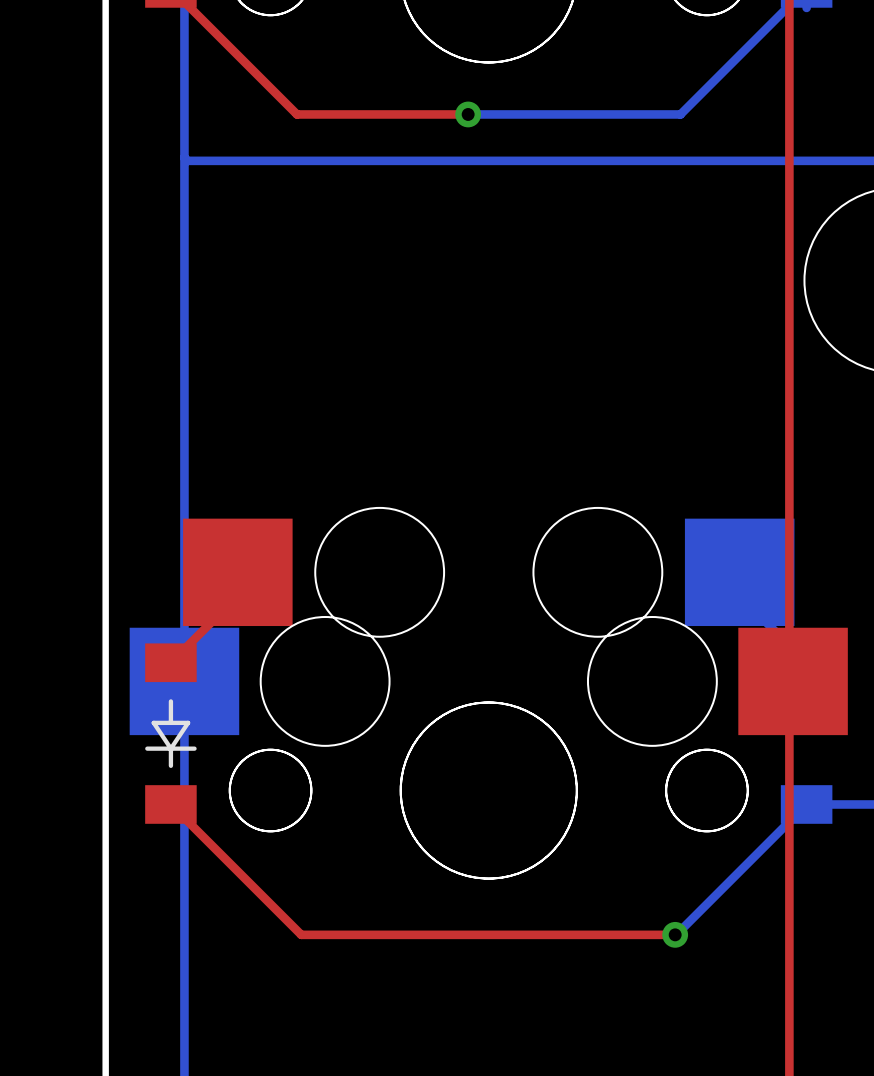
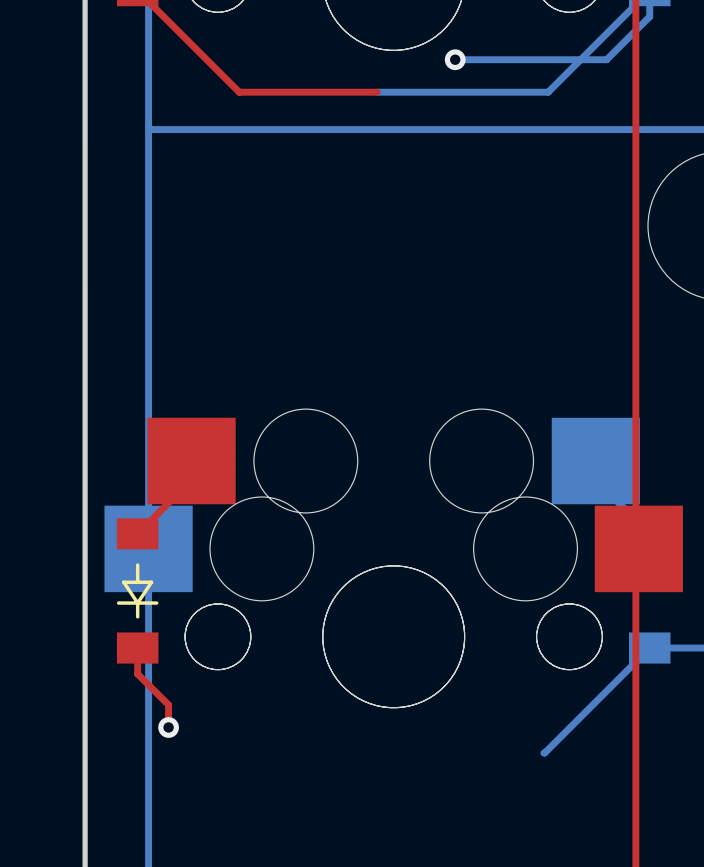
bottom track: none -> (649, 6) (649, 16) (606, 59) (455, 59)
via position: (468, 114) -> (455, 59)
top track: (170, 804) (301, 934) (675, 934) -> (137, 648) (137, 674) (168, 704) (168, 727)
via: none -> (168, 727)
via: (675, 934) -> none

